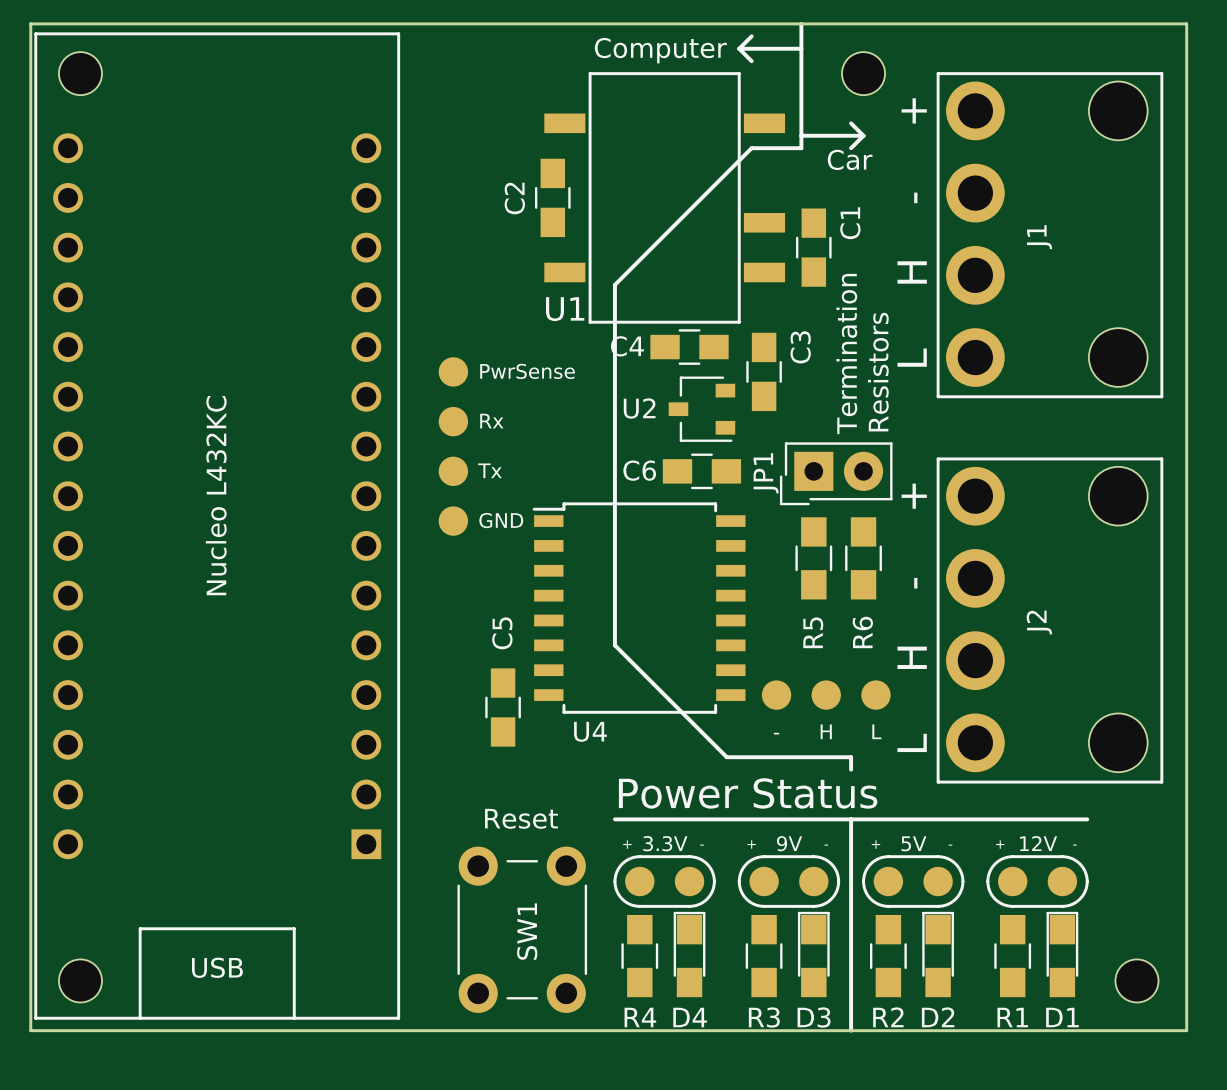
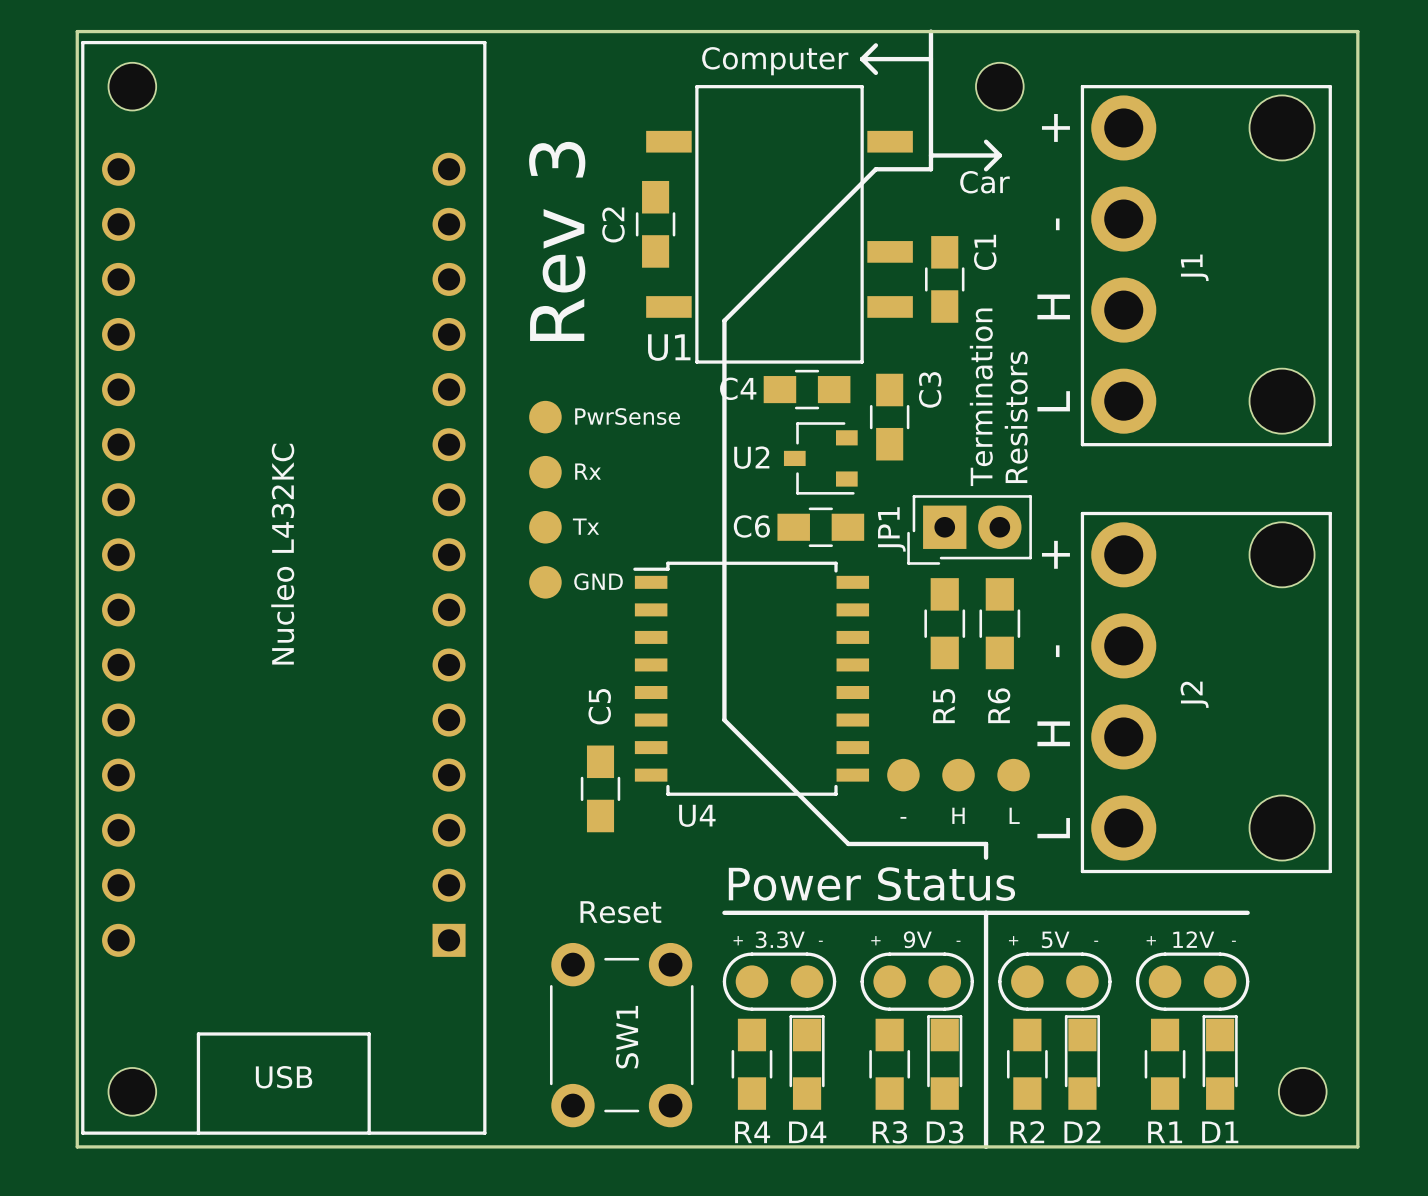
text: none -> Rev 3 (557, 241)

